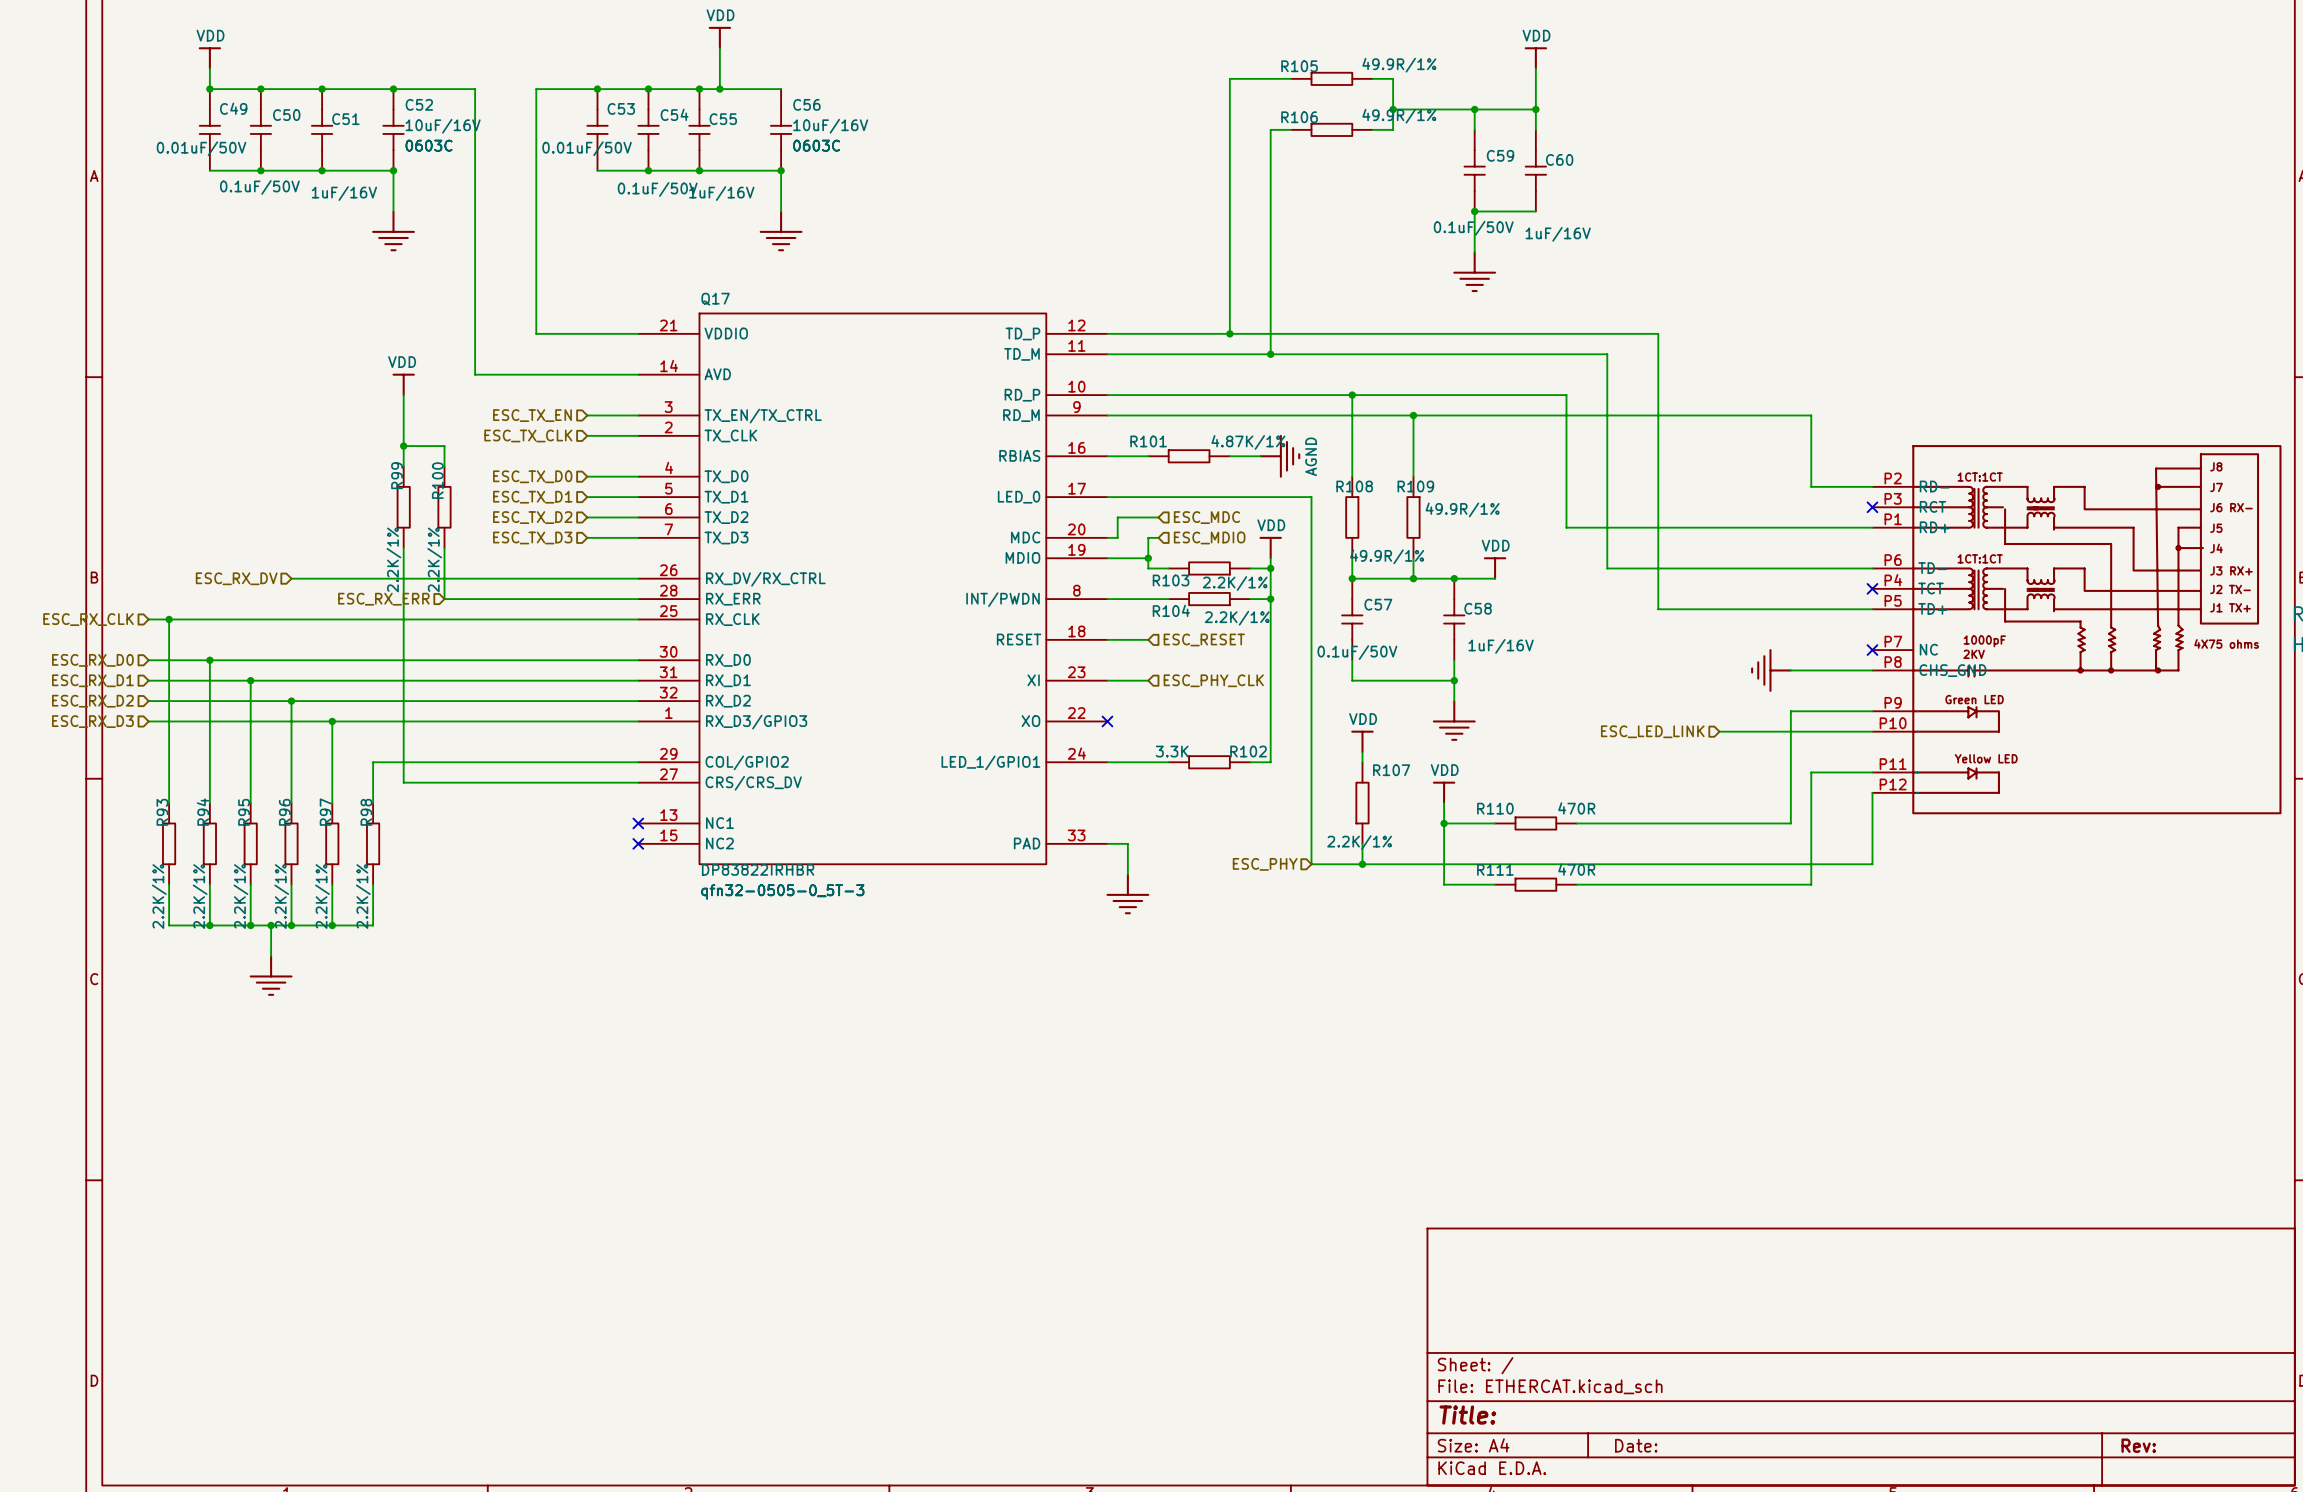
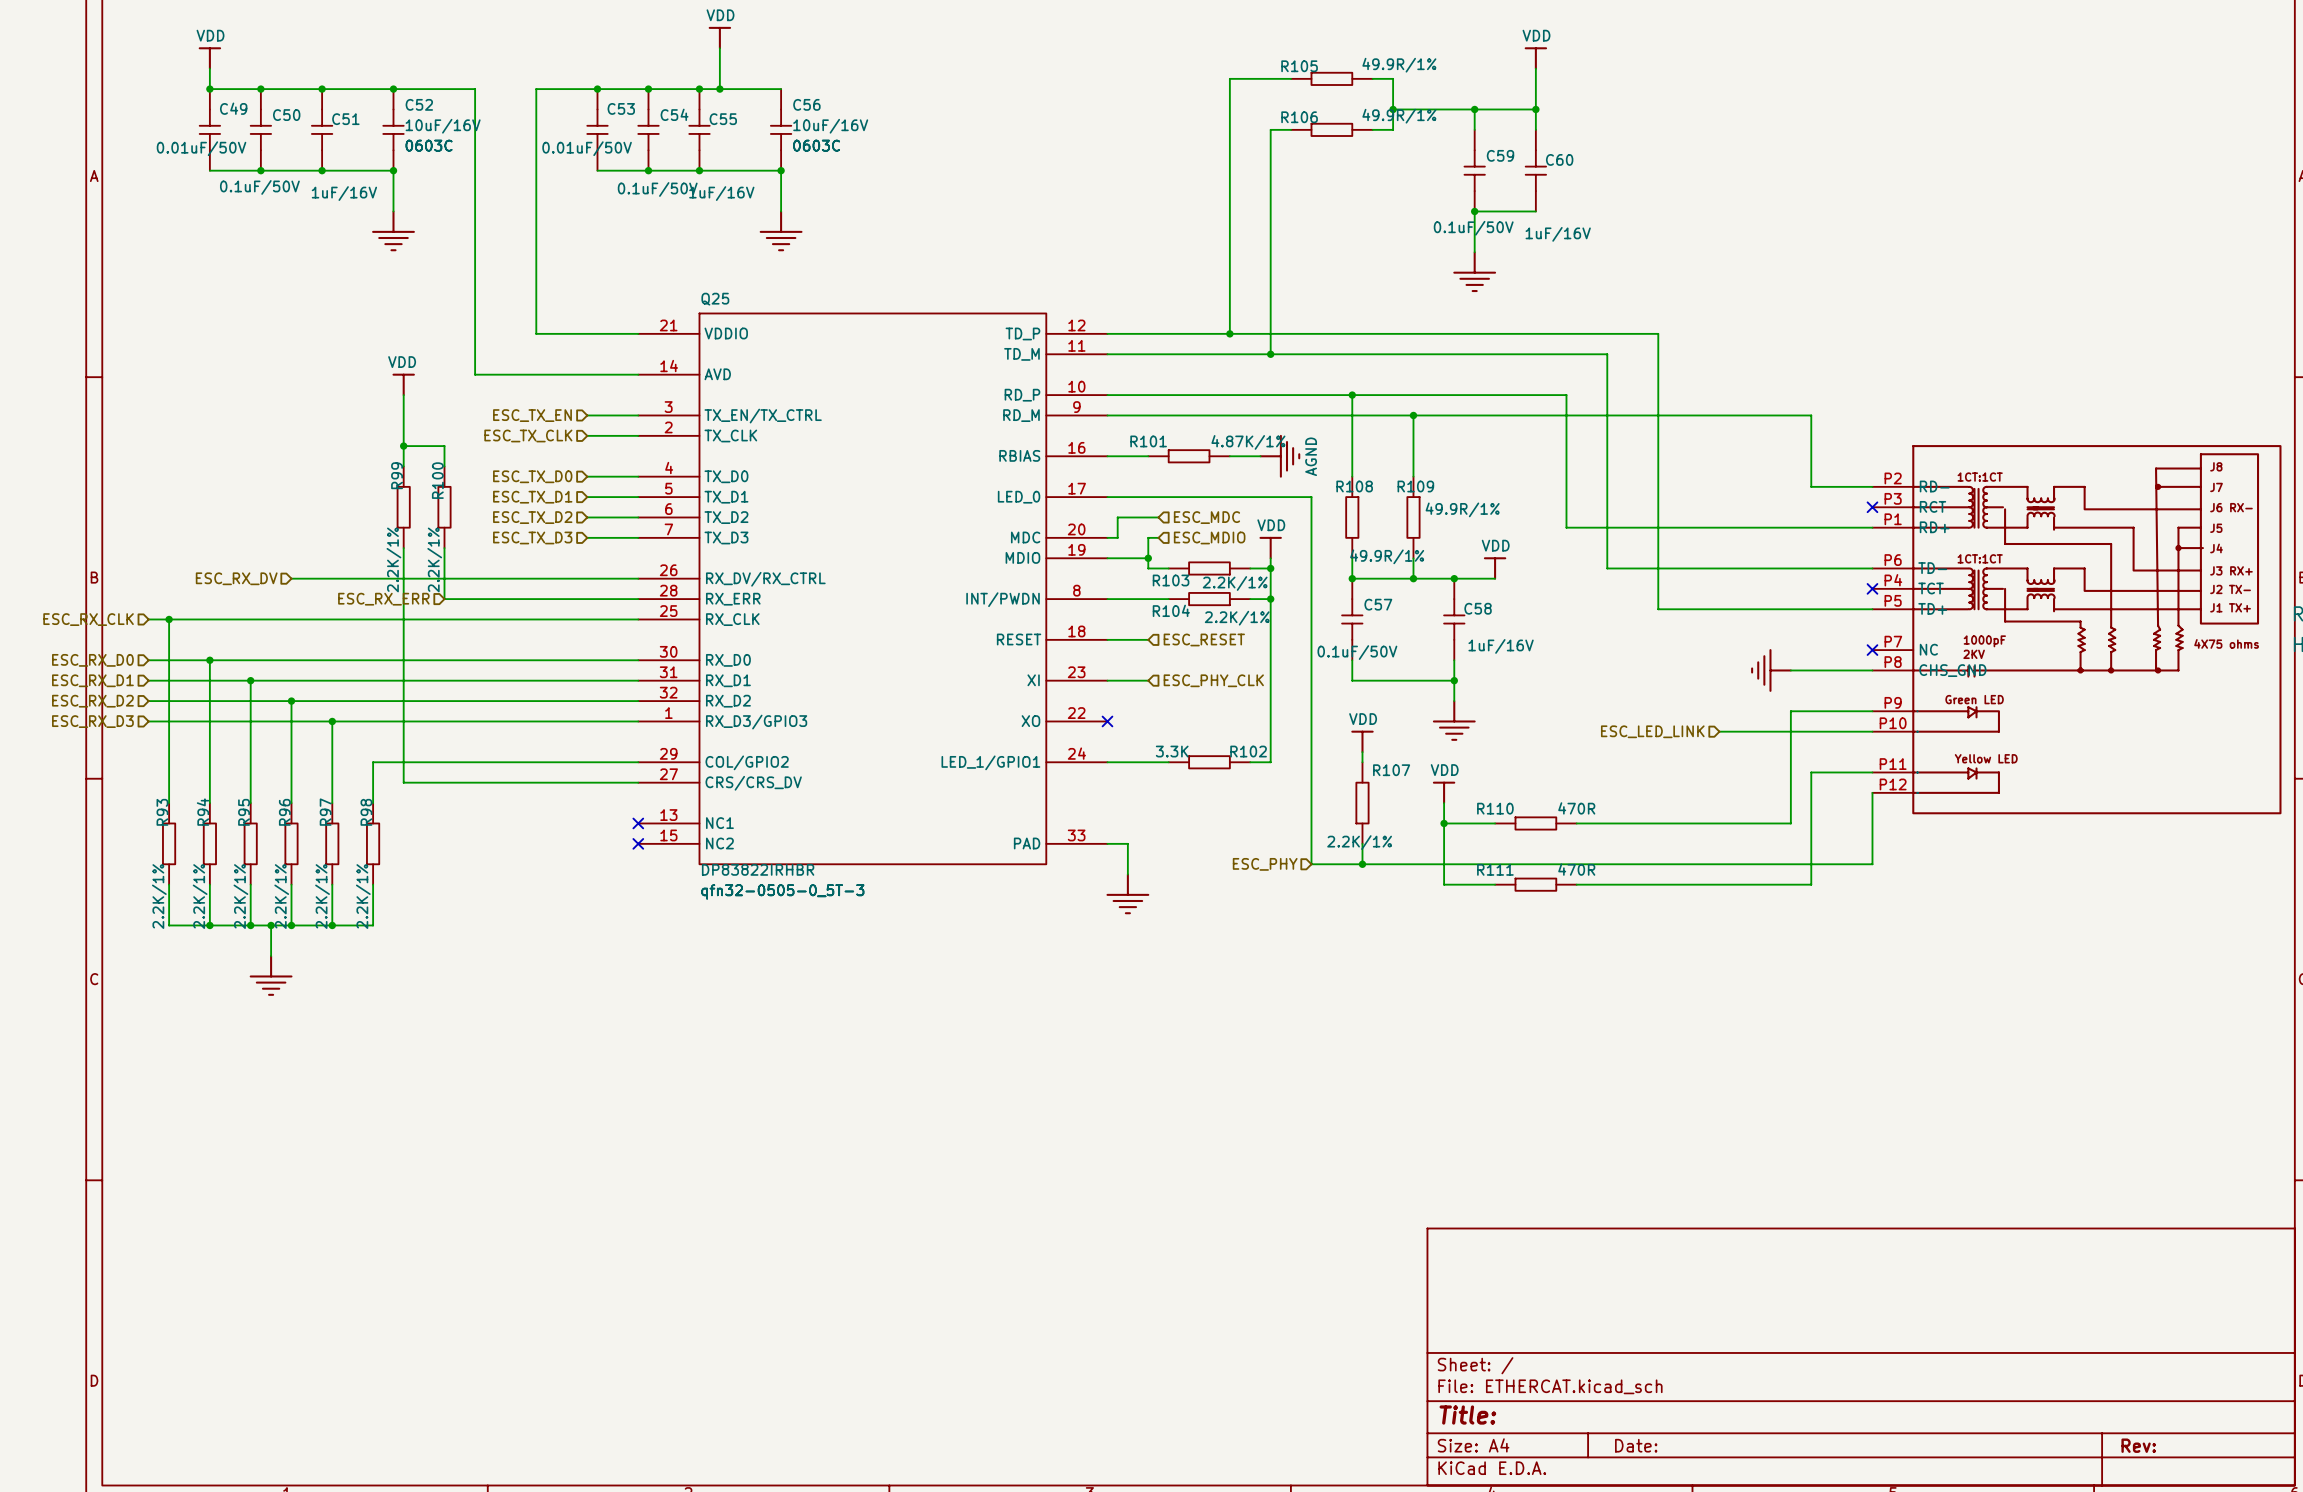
Q17 name: Q17 (715, 299) -> Q25 (715, 299)

